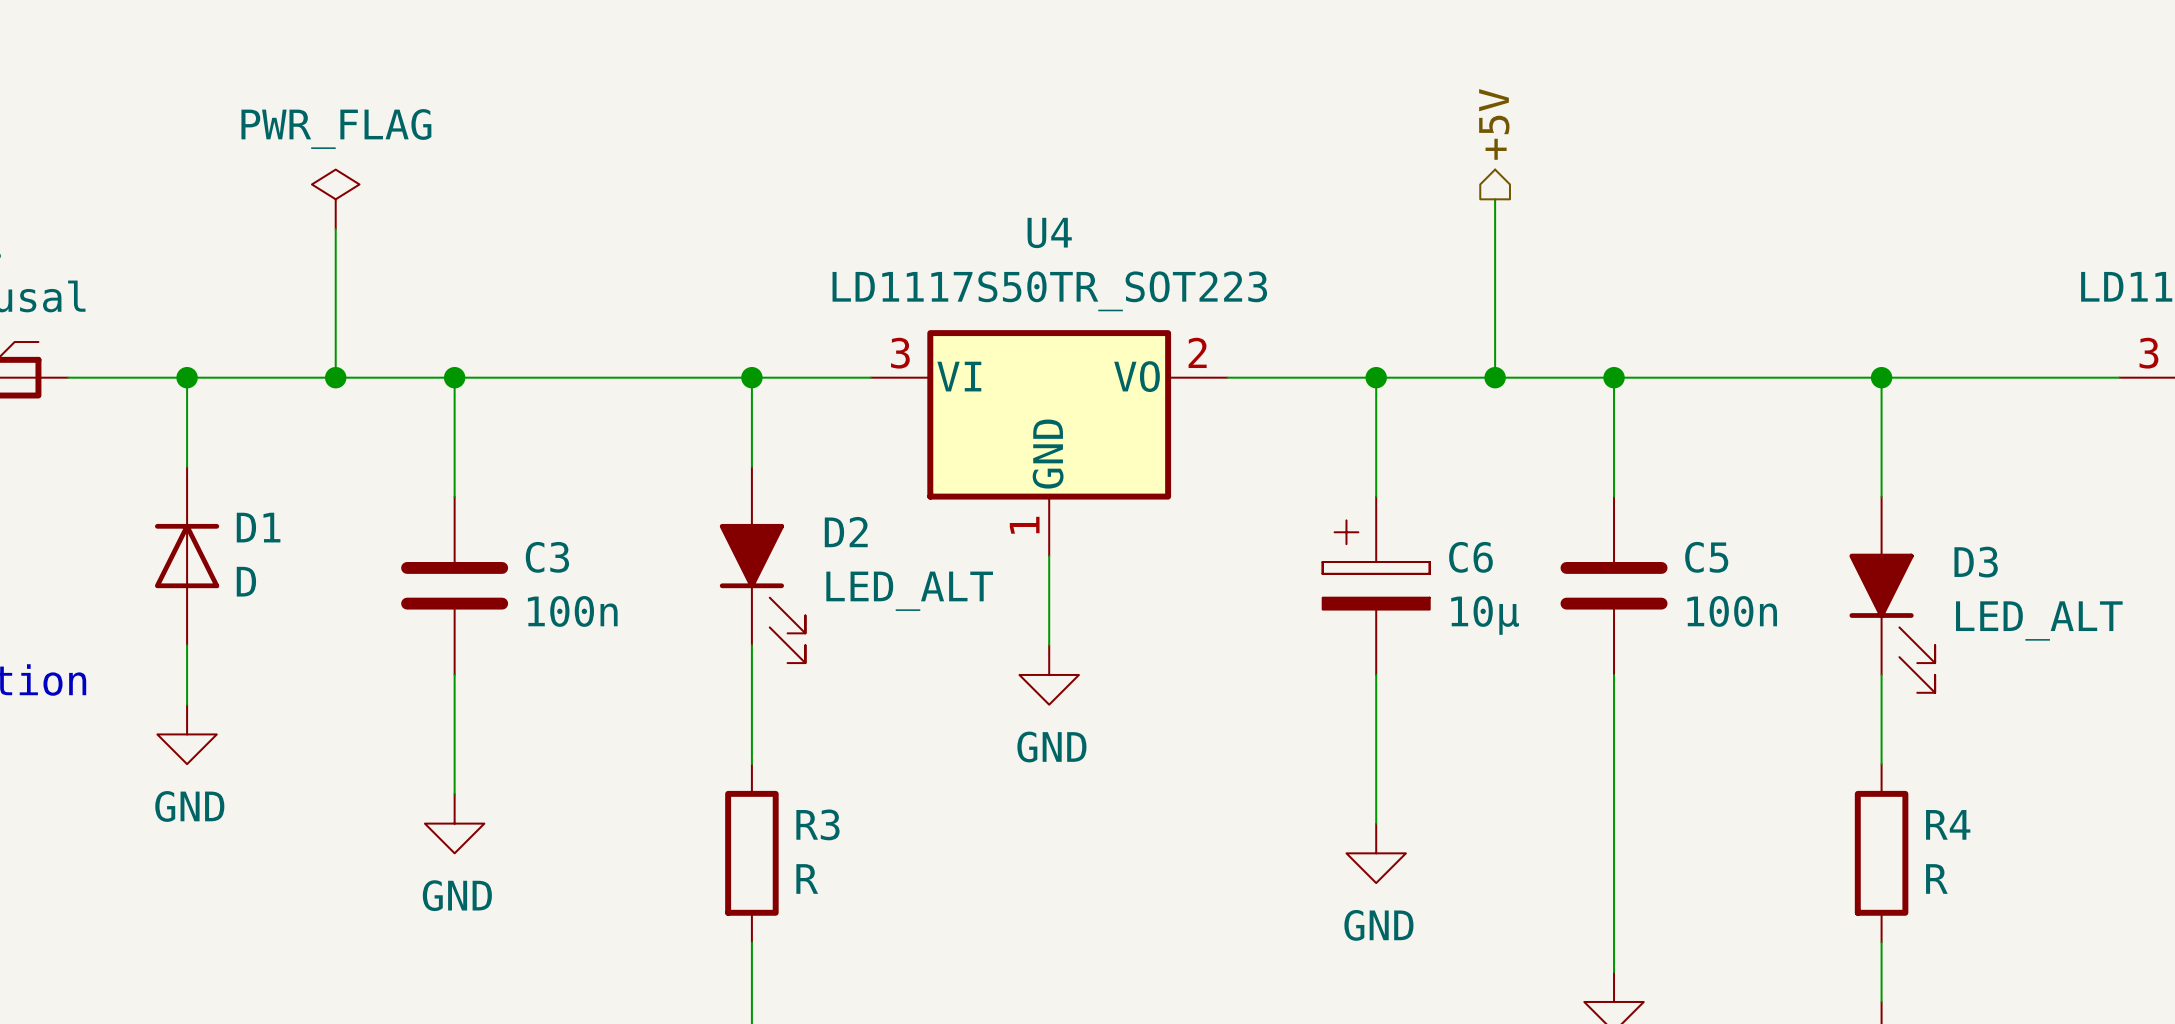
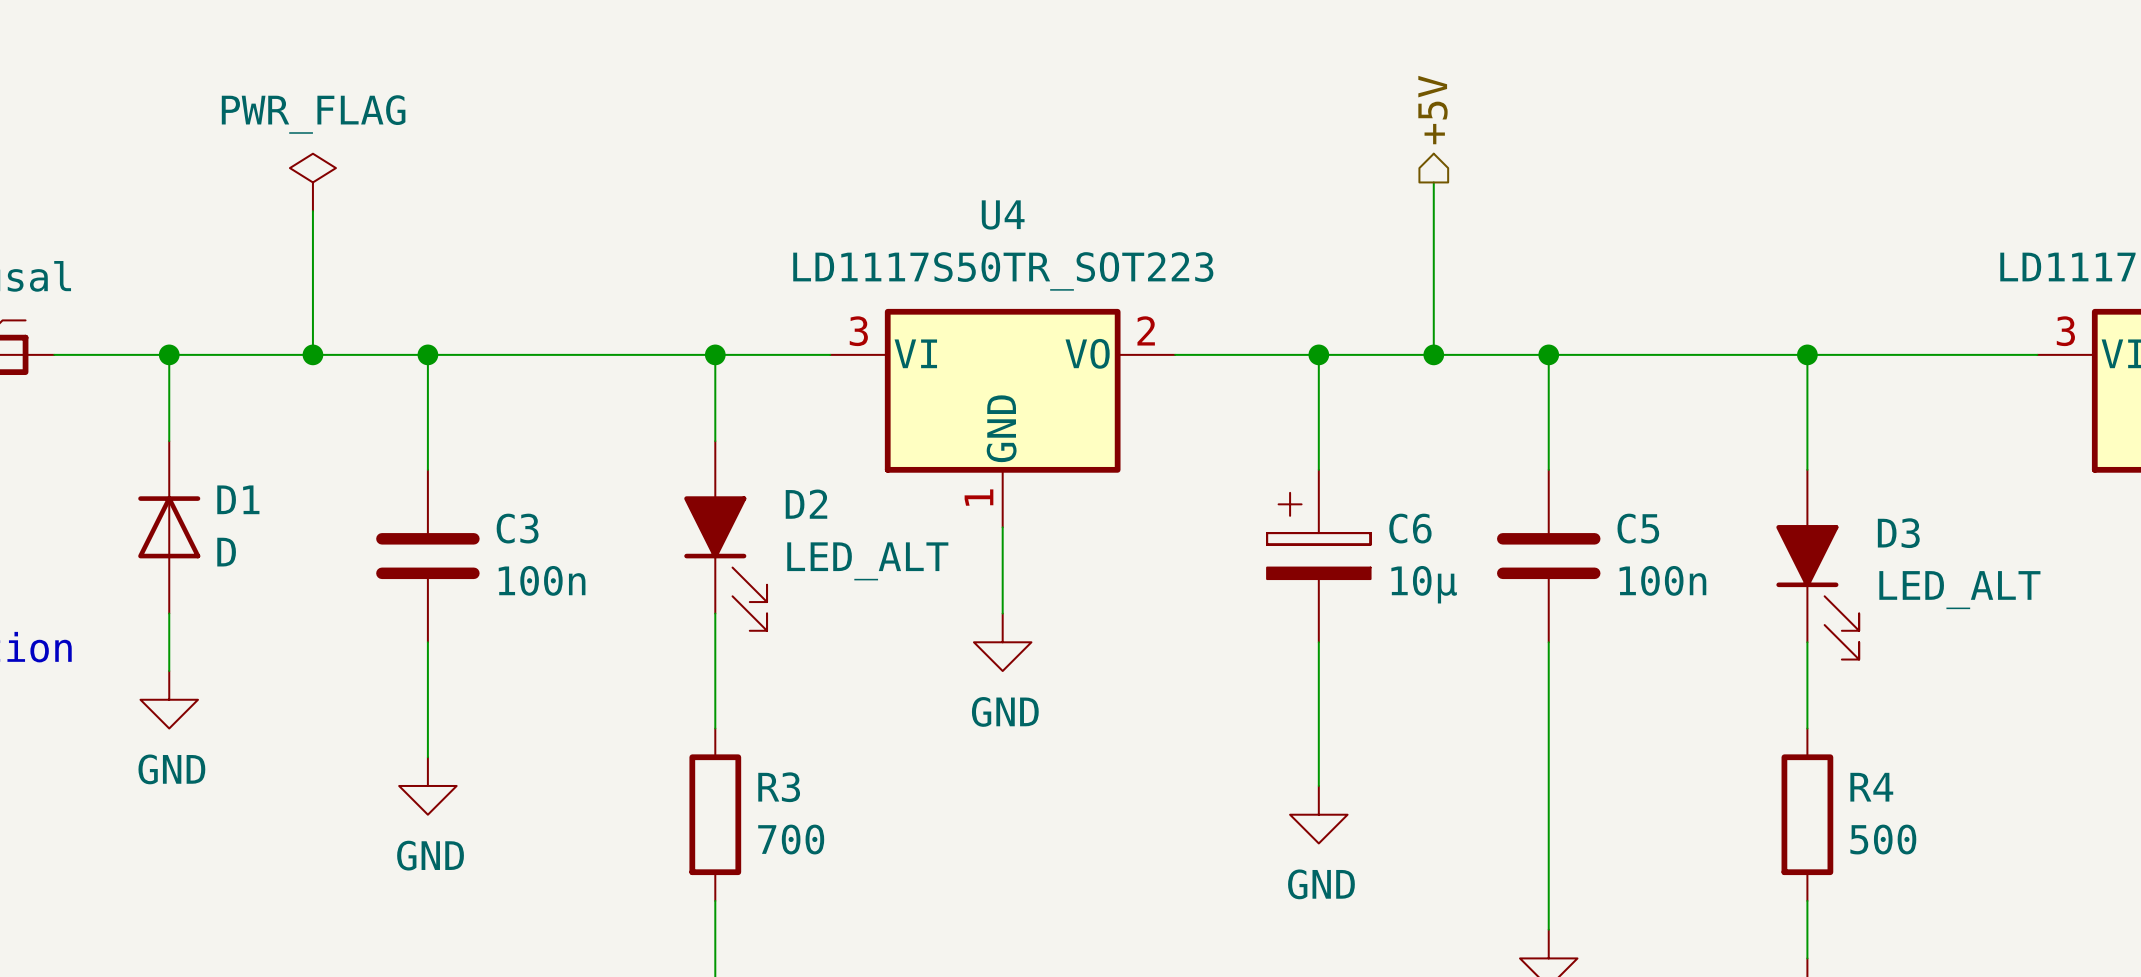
R3 value: R (807, 878) -> 700 (791, 839)
R4 value: R (1936, 878) -> 500 (1883, 839)

